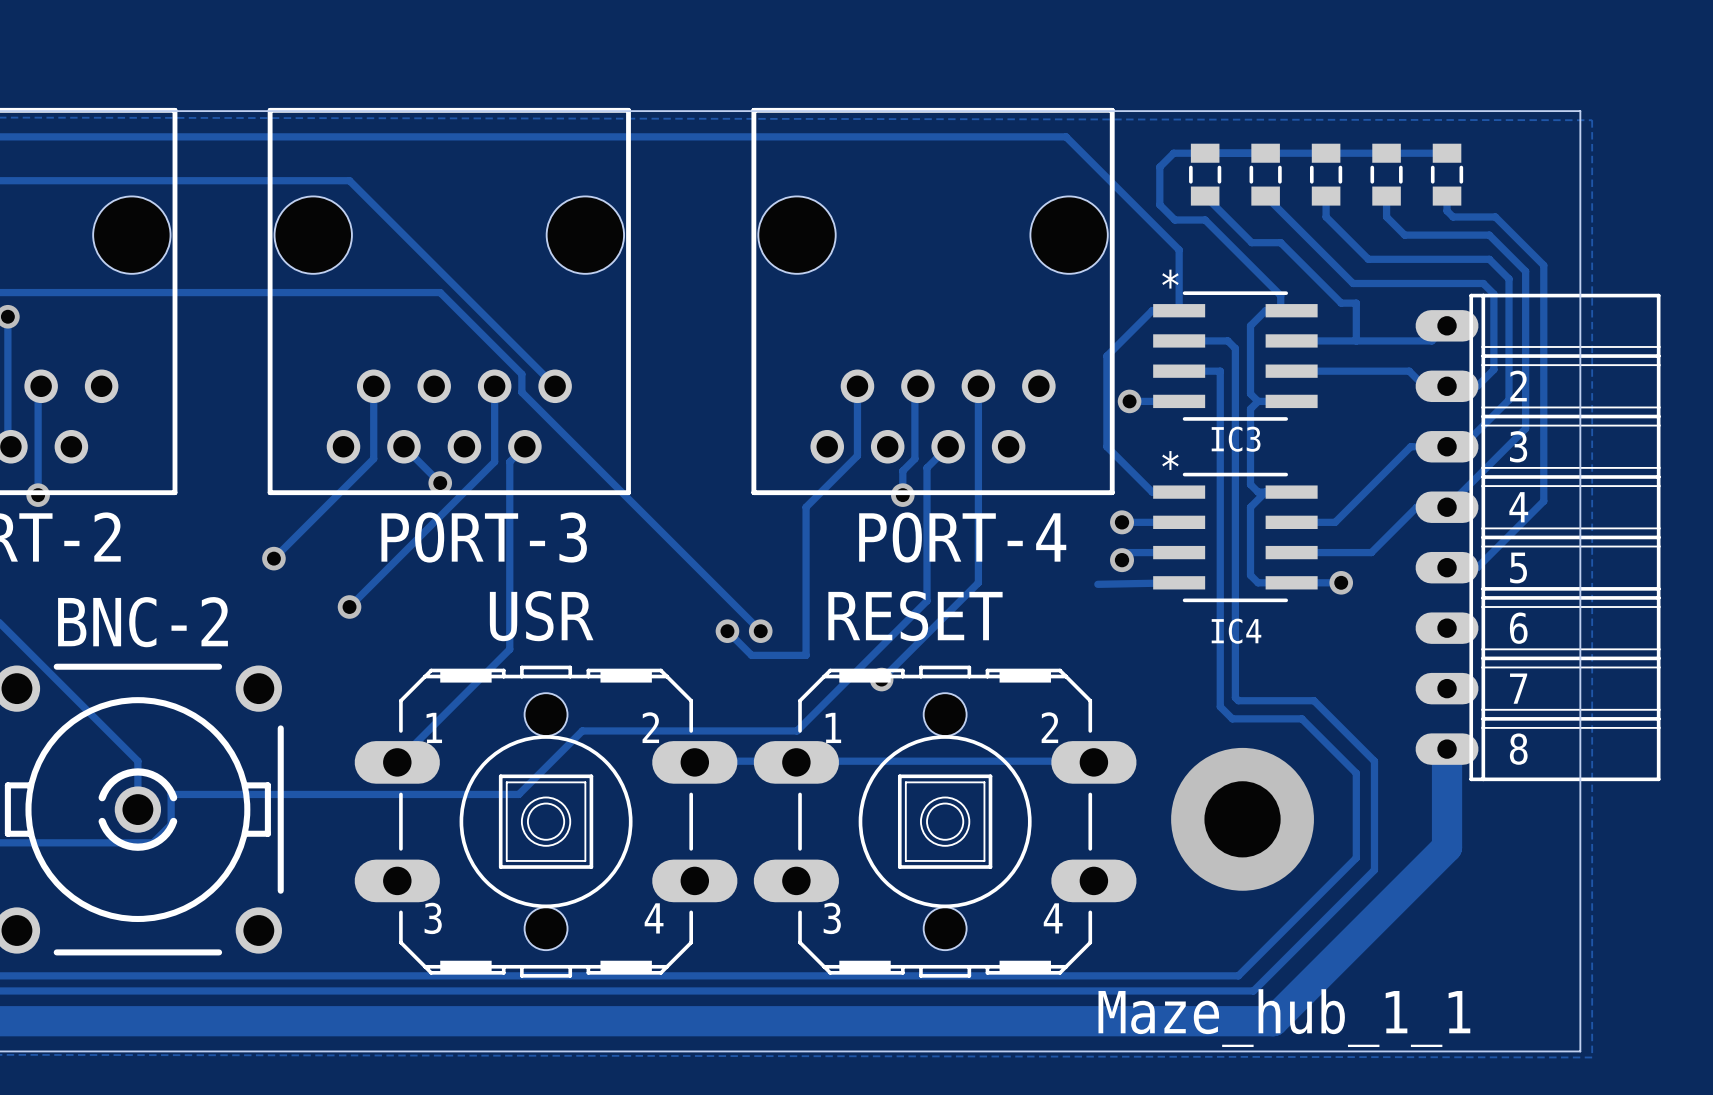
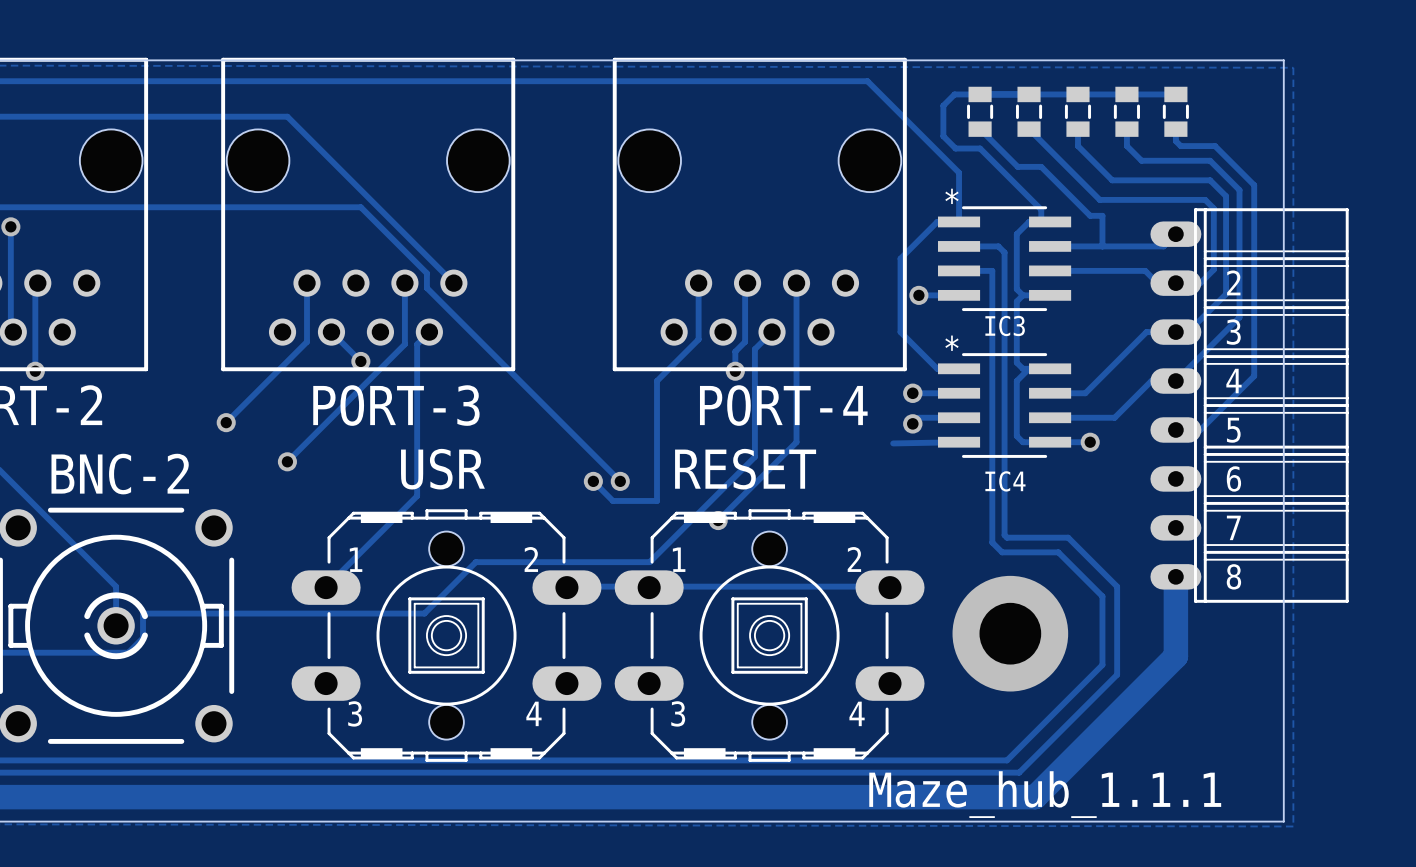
text: Maze_hub_1_1 (1284, 1018) -> Maze_hub_1.1.1 (1045, 794)

